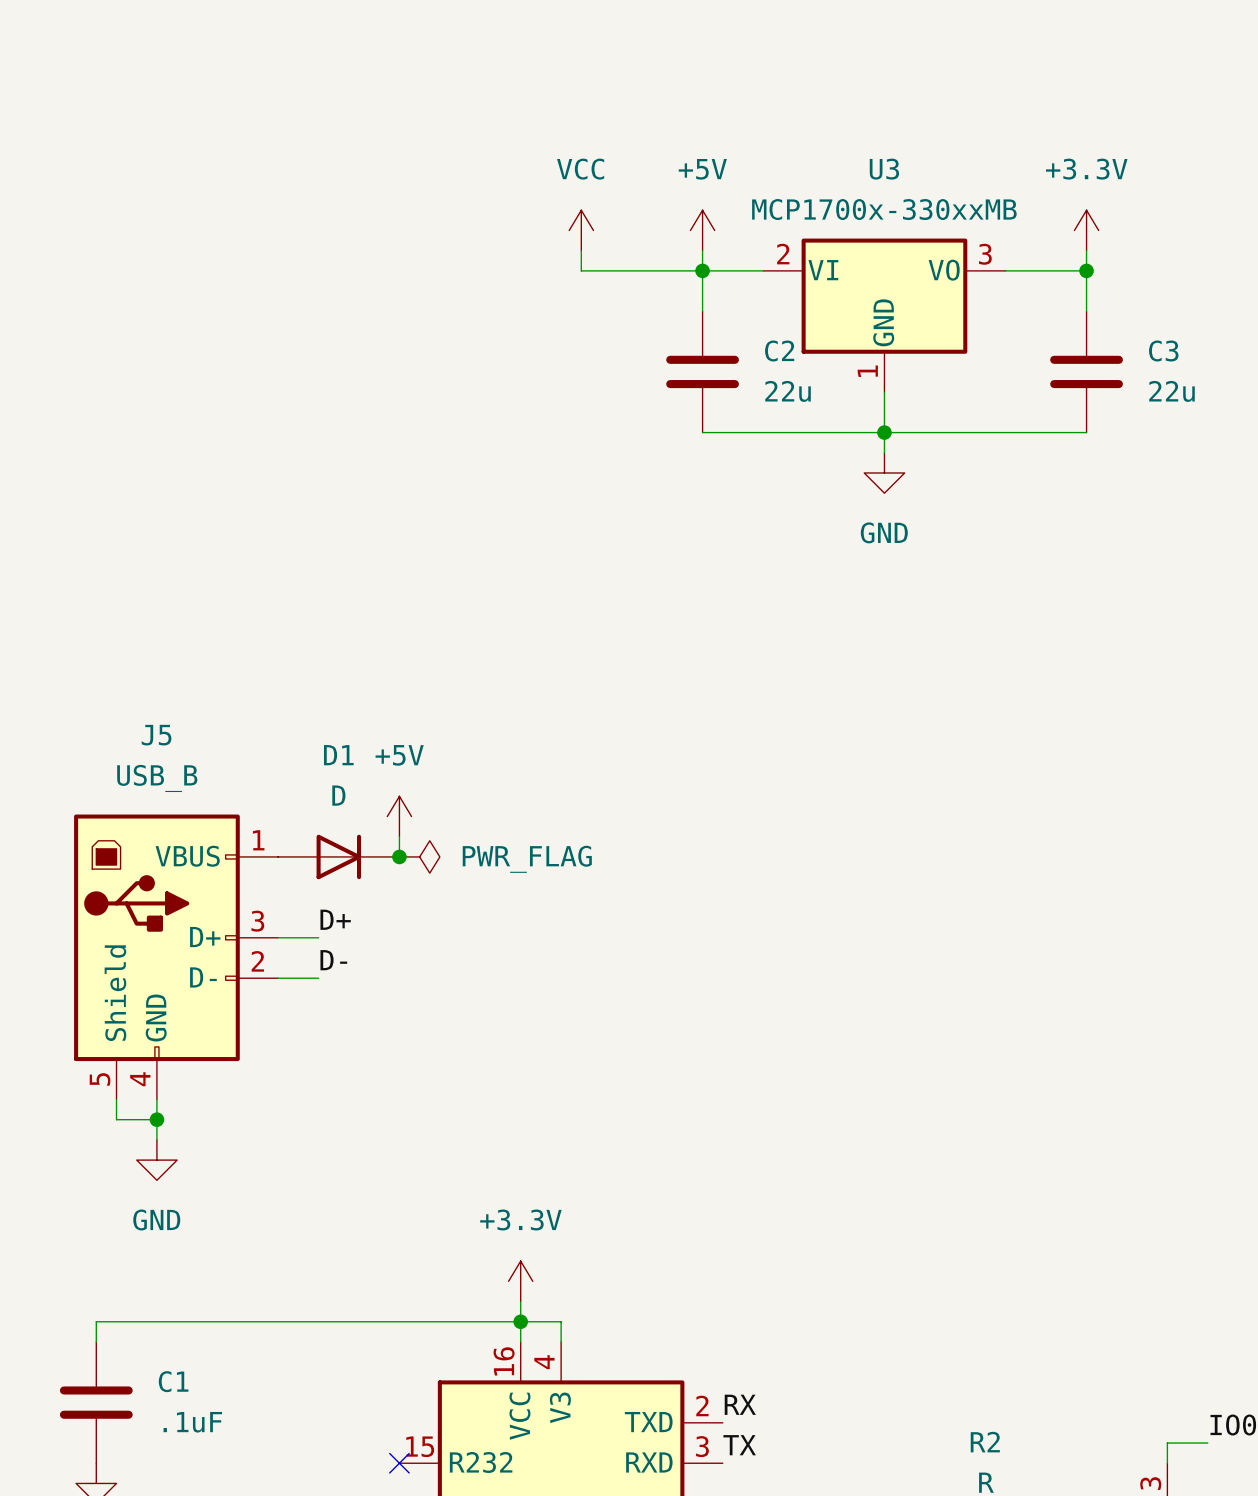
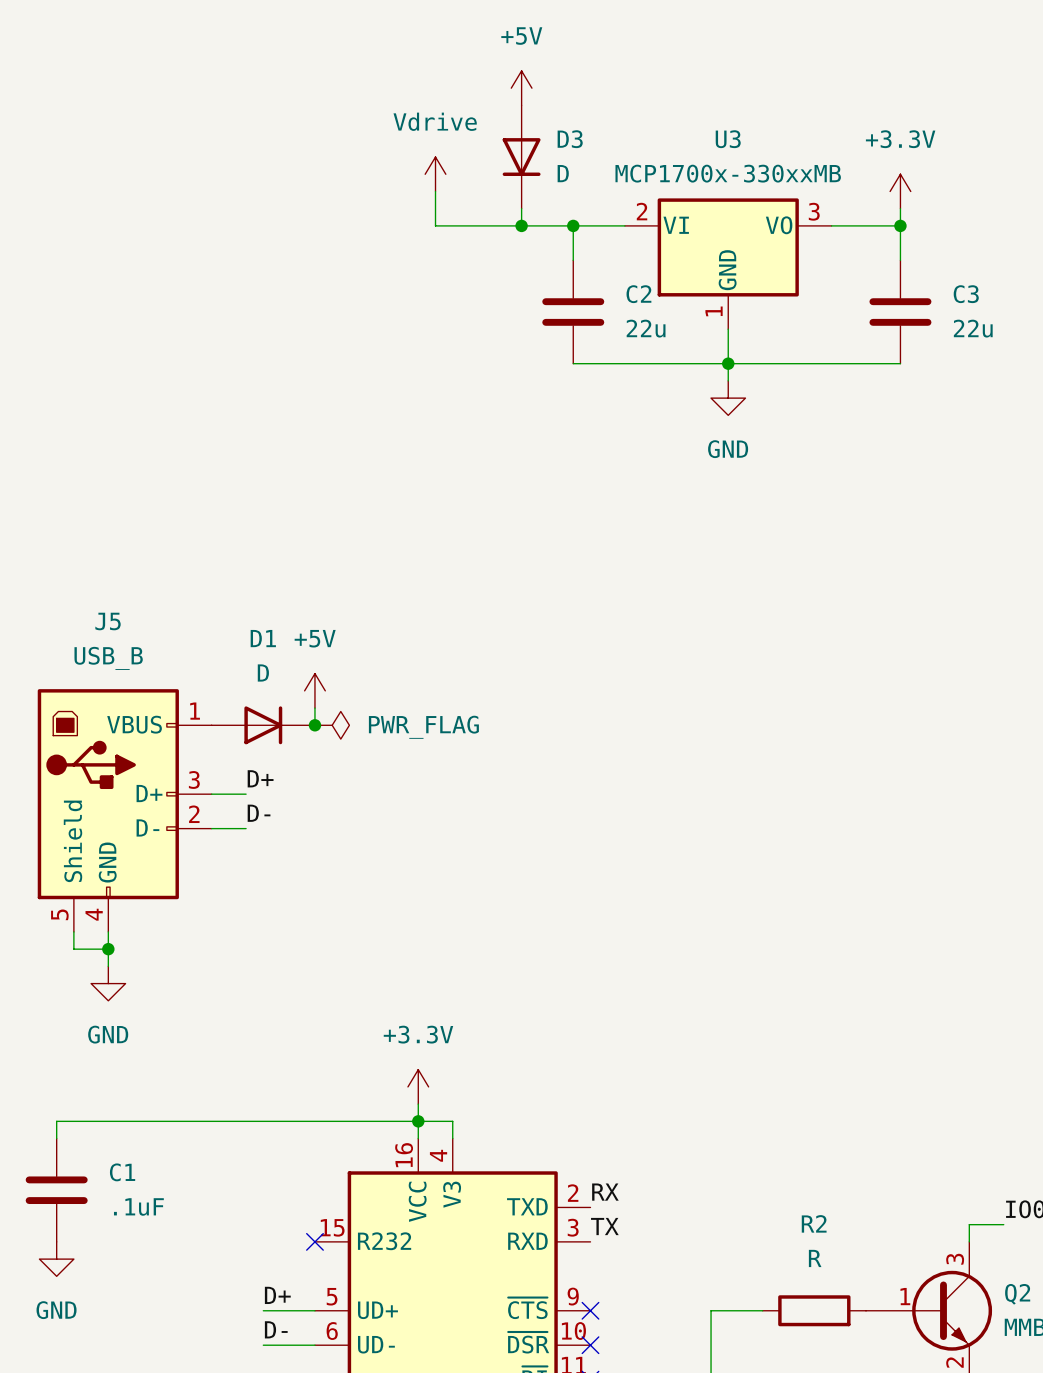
D3: none -> D (521, 157)
power symbol: none -> Vdrive (435, 174)
power symbol: VCC (581, 230) -> none
power symbol position: +5V (702, 230) -> +5V (521, 88)
wire: (581, 250) (581, 270) -> (435, 191) (435, 225) (469, 225)
wire: (702, 250) (702, 270) -> (521, 208) (521, 225)
junction: none -> (521, 225)

